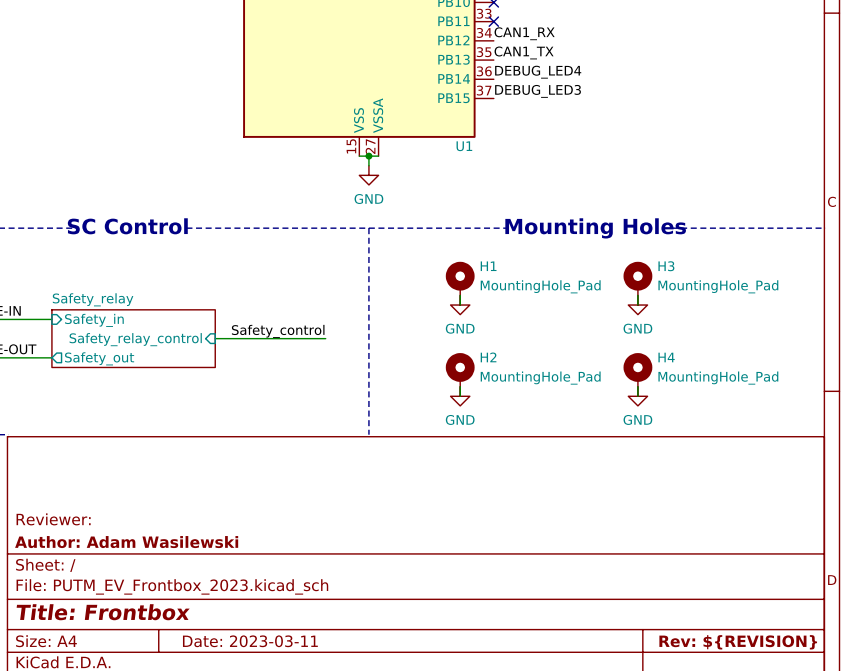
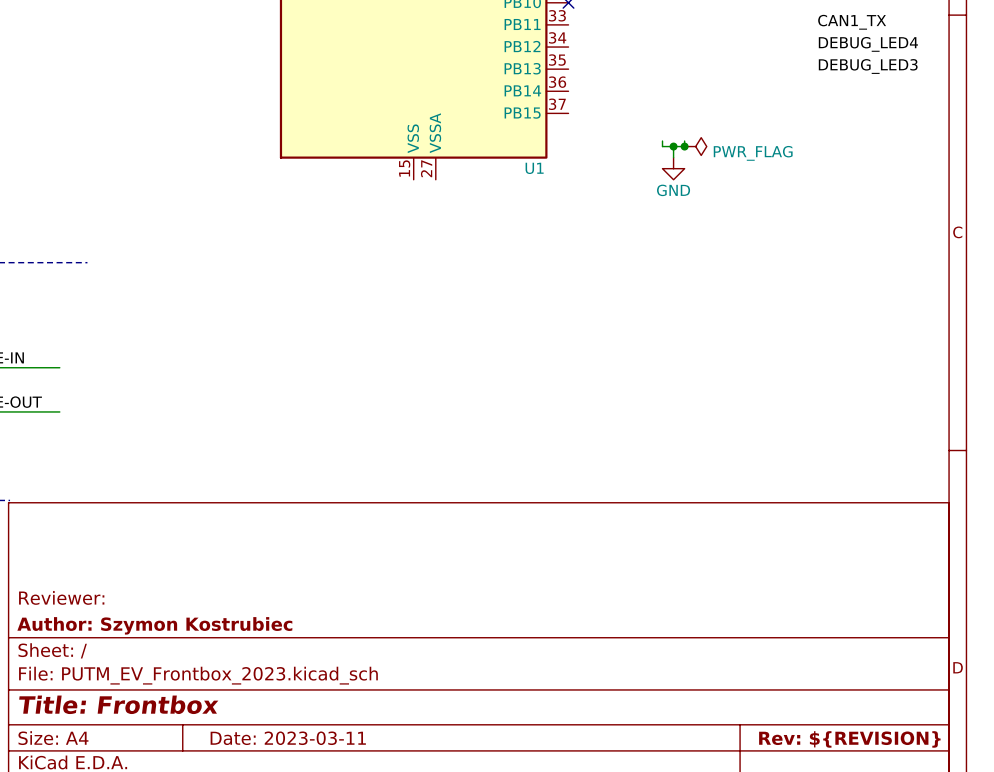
label: none -> CAN1_TX (852, 22)
no-connect mark: (493, 21) -> none
label: CAN1_RX (524, 33) -> none
label: none -> DEBUG_LED4 (868, 44)
label: CAN1_TX (524, 52) -> none
label: none -> DEBUG_LED3 (868, 66)
label: DEBUG_LED4 (538, 72) -> none
label: DEBUG_LED3 (538, 91) -> none
wire: none -> (662, 141) (662, 146) (684, 146) (684, 141)
junction: none -> (673, 146)
junction: none -> (684, 146)
power symbol: none -> PWR_FLAG (695, 146)
power symbol: none -> GND (673, 168)
wire: (359, 156) (378, 156) -> none
wire: (368, 156) (368, 165) -> none
junction: (368, 156) -> none
power symbol: GND (368, 175) -> none
text: SC Control (127, 226) -> none
line: (186, 228) (508, 228) -> none
line: (368, 228) (368, 434) -> none
text: Mounting Holes (595, 228) -> none
line: (671, 228) (825, 228) -> none
H1: MountingHole_Pad (460, 283) -> none
H3: MountingHole_Pad (637, 283) -> none
wire: (460, 295) (460, 305) -> none
wire: (637, 295) (637, 305) -> (673, 146) (673, 157)
power symbol: GND (460, 305) -> none
power symbol: GND (637, 305) -> none
sheet pin: Safety_in (94, 320) -> none
label: Safety_control (278, 331) -> none
sheet Safety_relay: (133, 338) -> none
wire: (215, 338) (325, 338) -> none
sheet pin: Safety_relay_control (135, 339) -> none
sheet pin: Safety_out (99, 358) -> none
H2: MountingHole_Pad (460, 374) -> none
H4: MountingHole_Pad (637, 374) -> none
wire: (460, 386) (460, 396) -> none
wire: (637, 386) (637, 396) -> none
power symbol: GND (460, 396) -> none
power symbol: GND (637, 396) -> none
title block: Author: Adam Wasilewski (126, 542) -> Author: Szymon Kostrubiec (154, 625)

